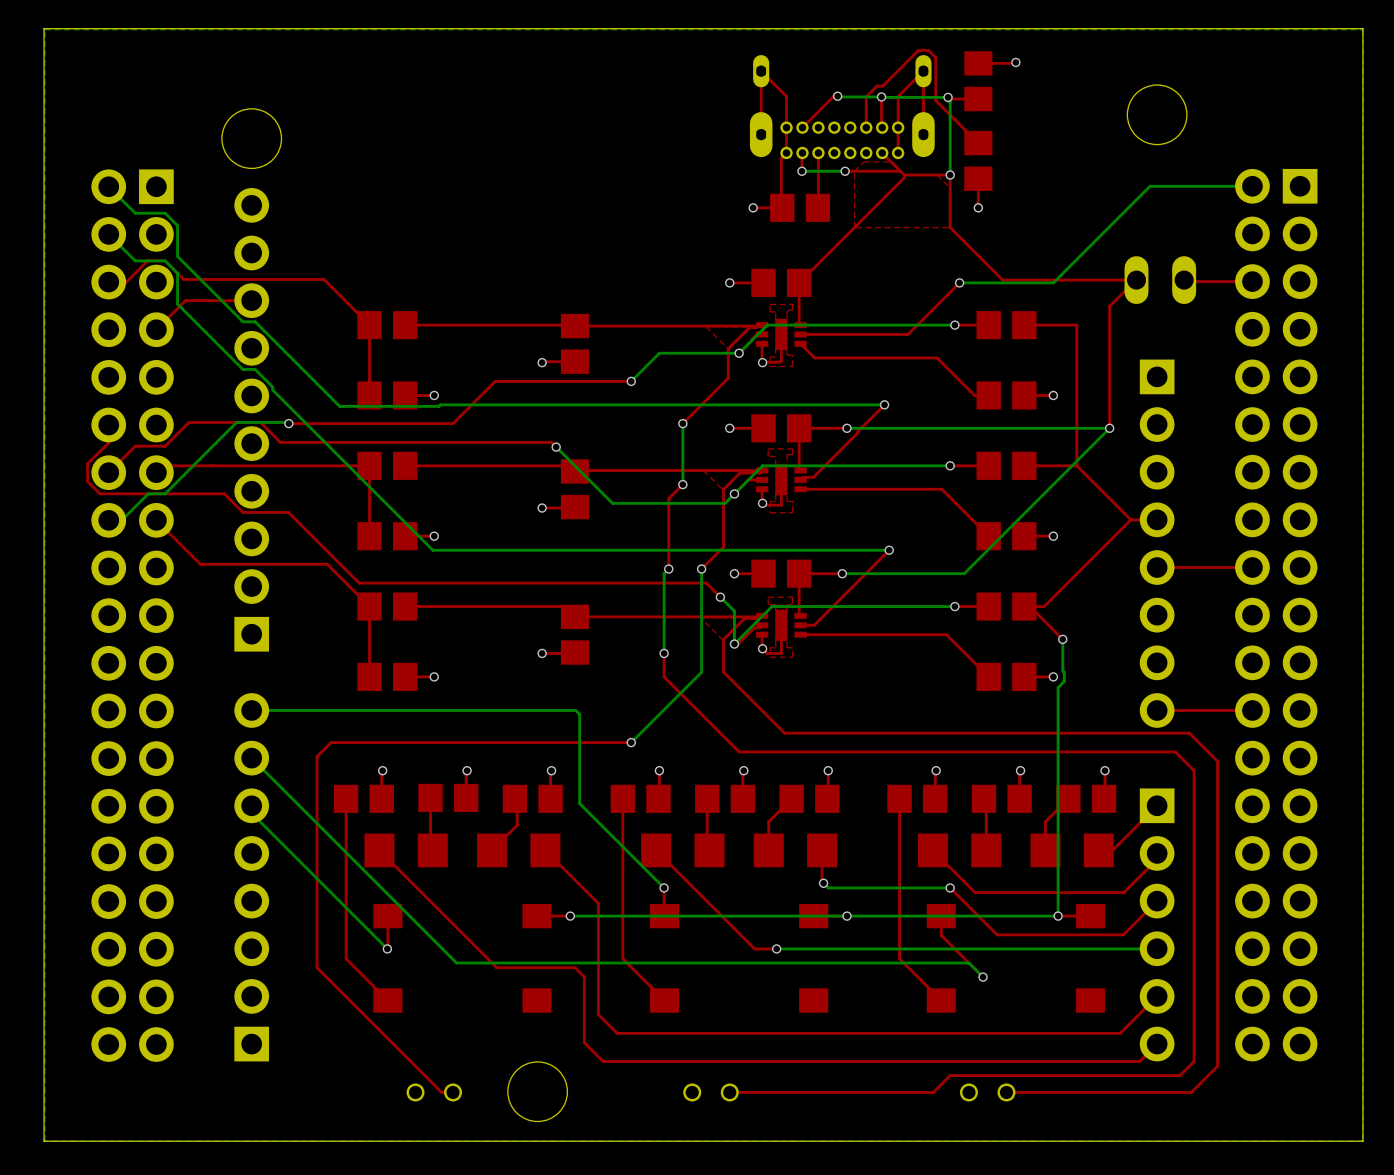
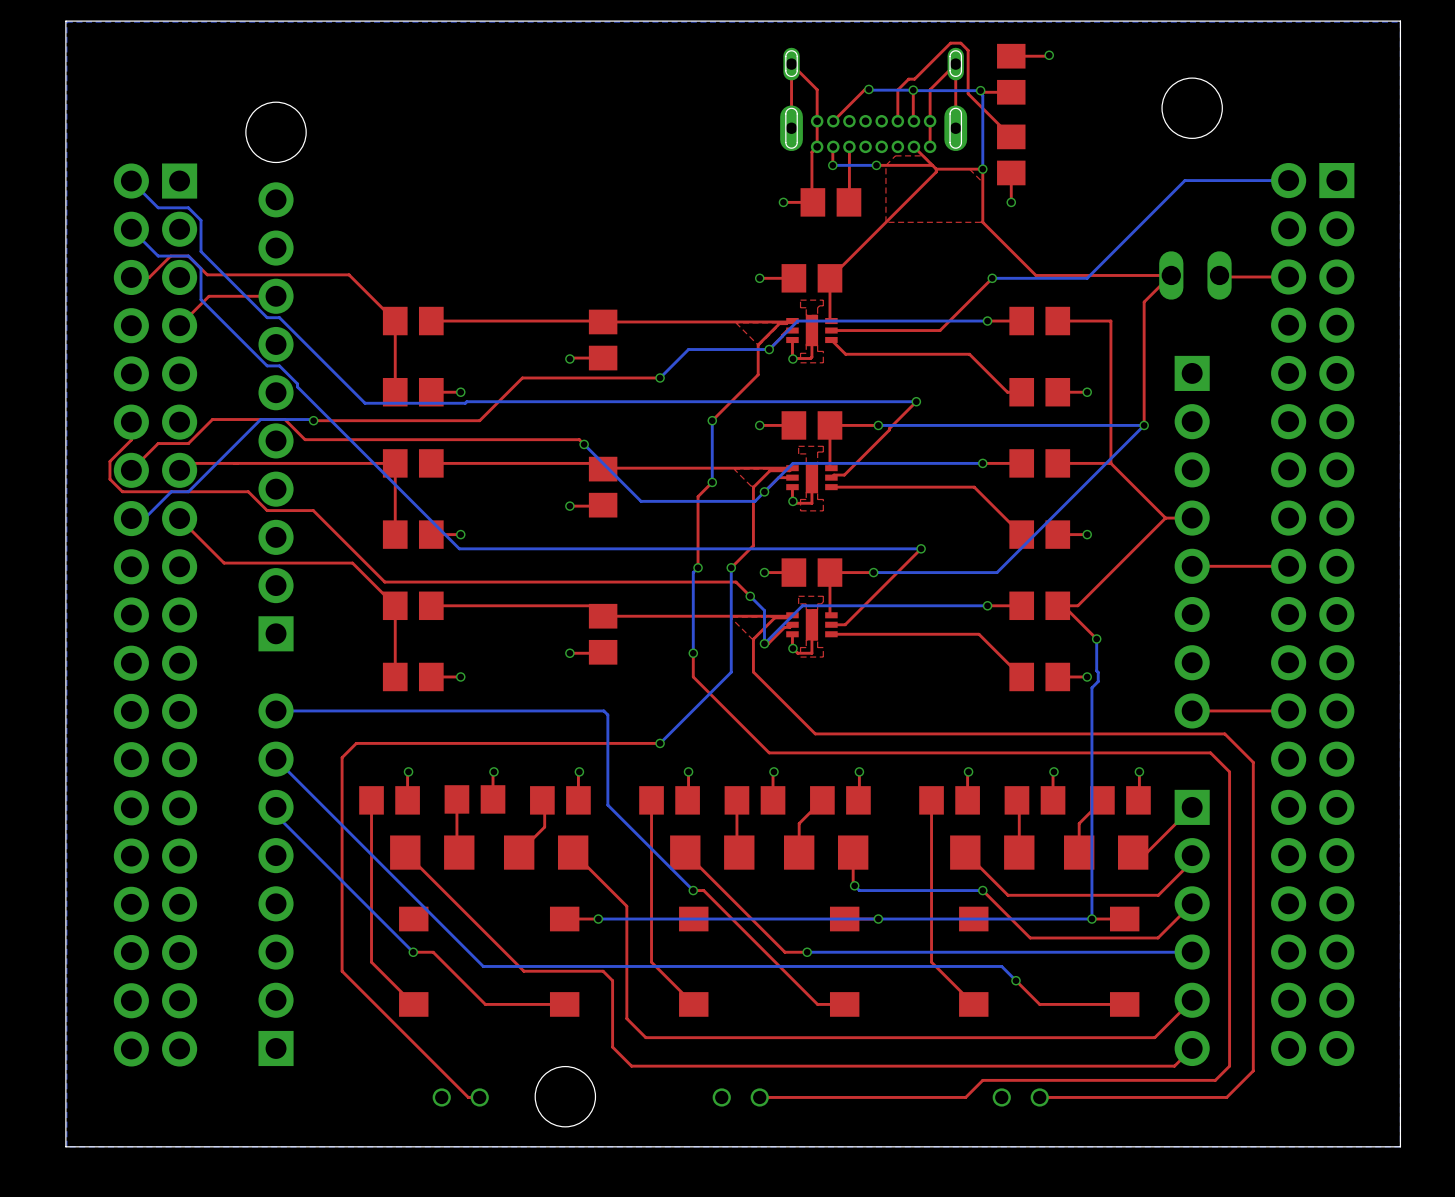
top track: (664, 887) (664, 916) -> (693, 890) (703, 890) (817, 1004) (844, 1004)
top track: (387, 916) (387, 948) -> (564, 1004) (485, 1004) (433, 952) (413, 952)
top track: (941, 916) (941, 935) (983, 977) -> (1124, 1004) (1039, 1004) (1016, 980)

